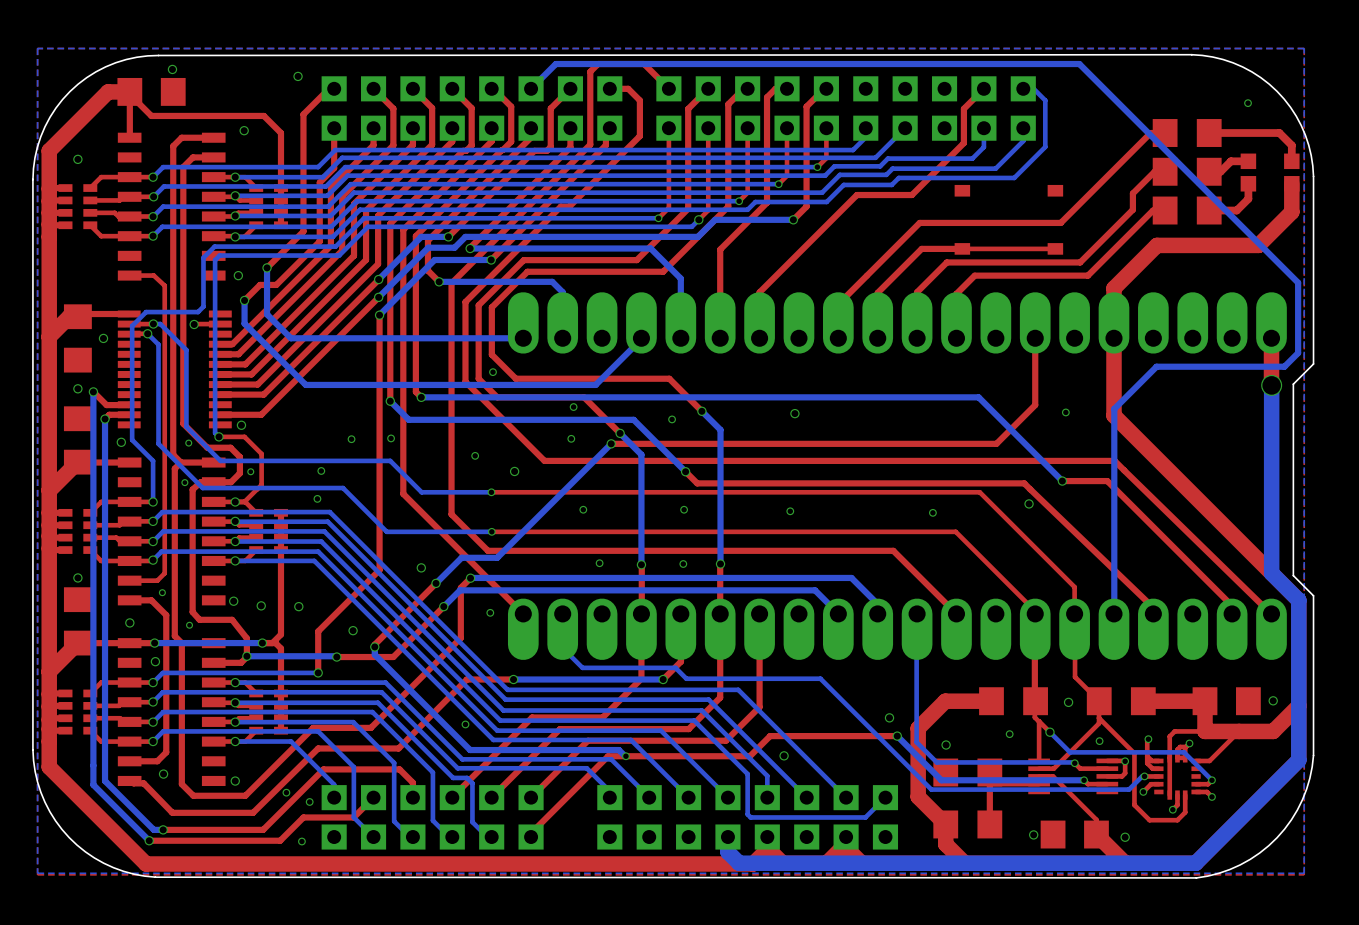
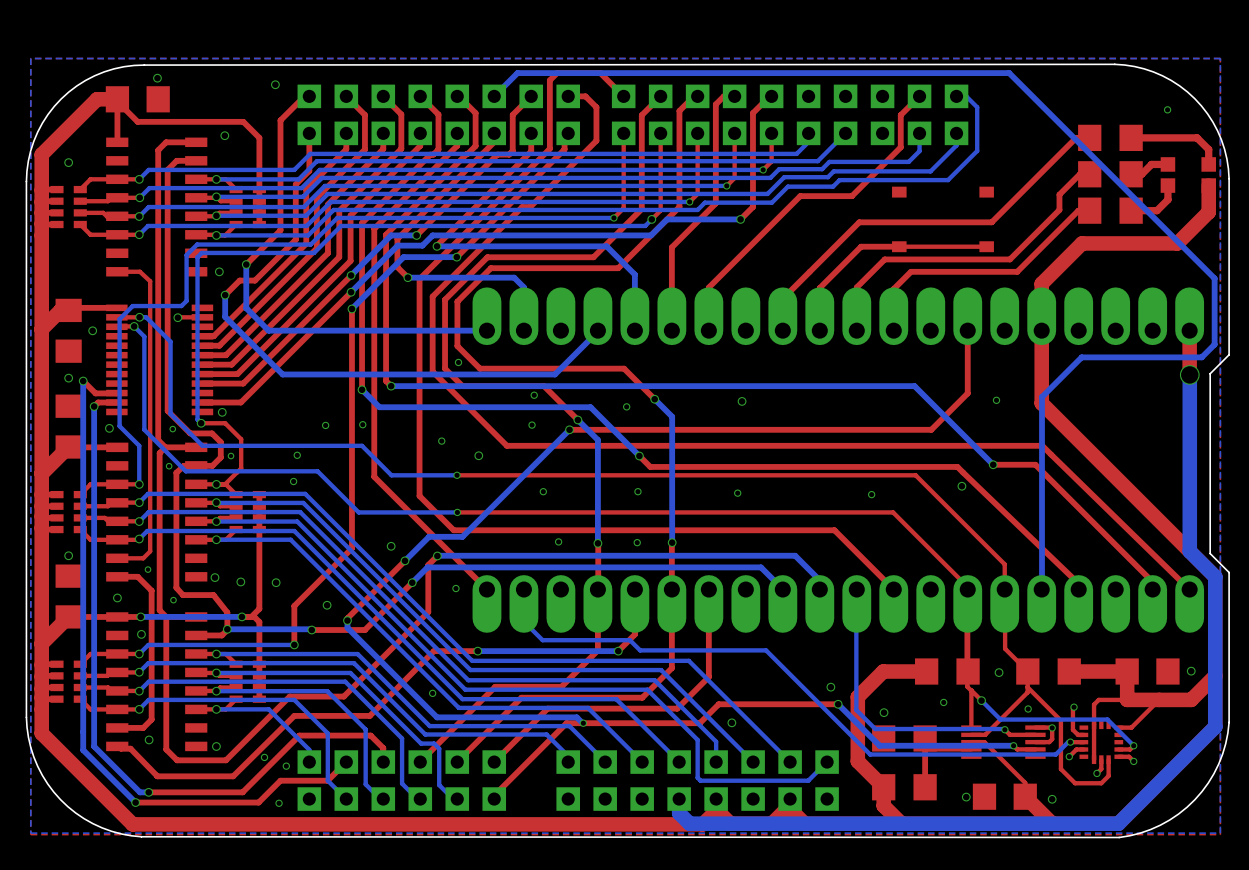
top track: (1189, 743) (1185, 747) (1185, 757) (1177, 757) (1177, 749) (1180, 746) (1185, 746) -> none
via: (1189, 743) -> none
top track: (1147, 756) (1151, 760) (1158, 760) -> none

